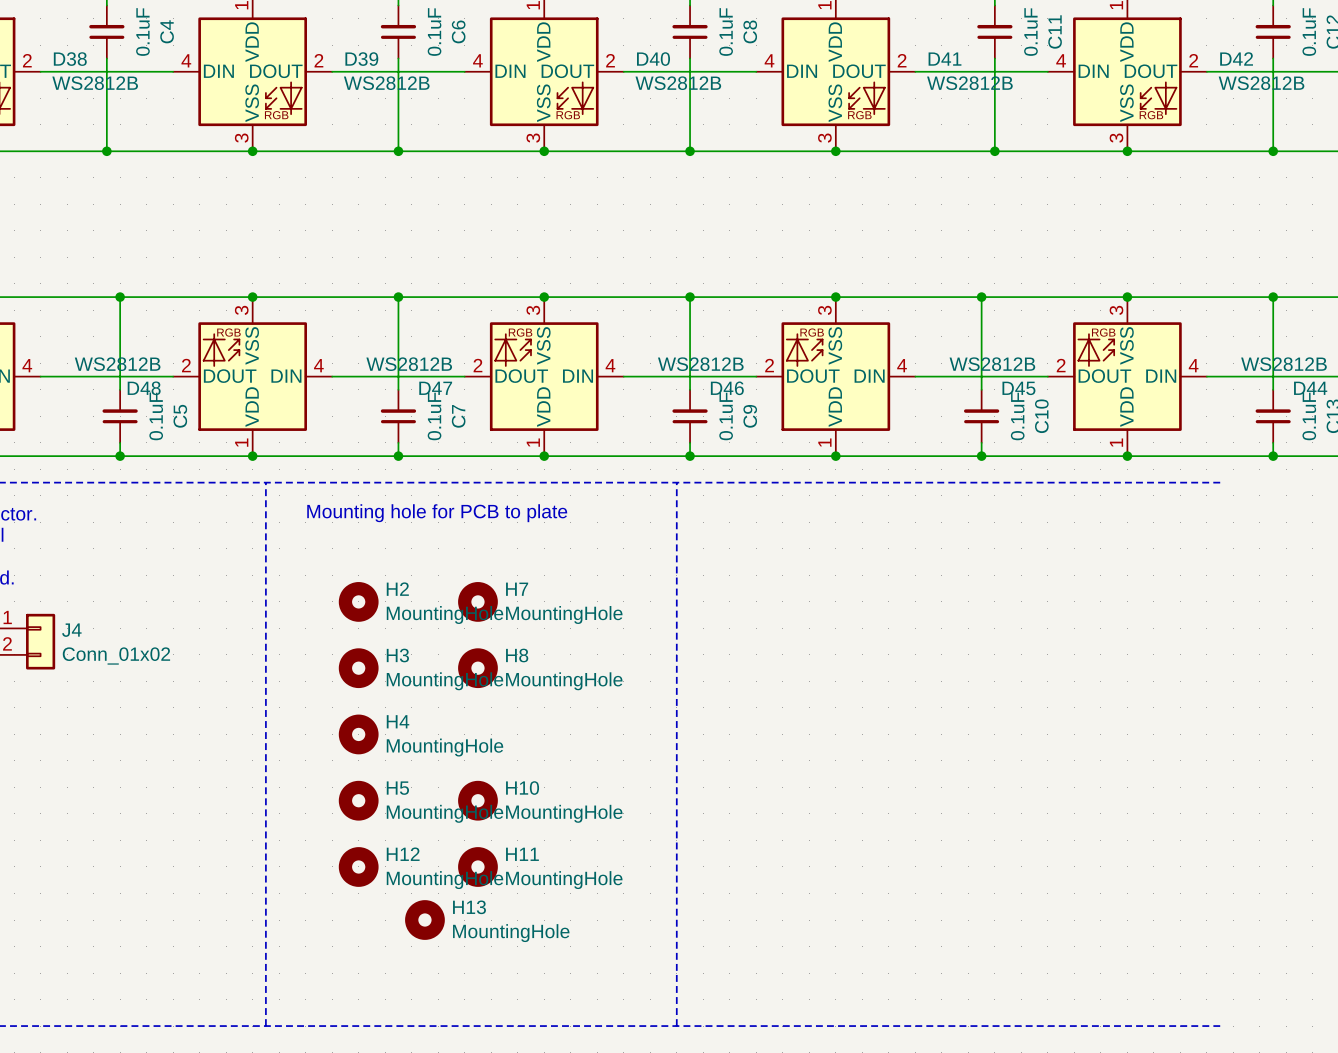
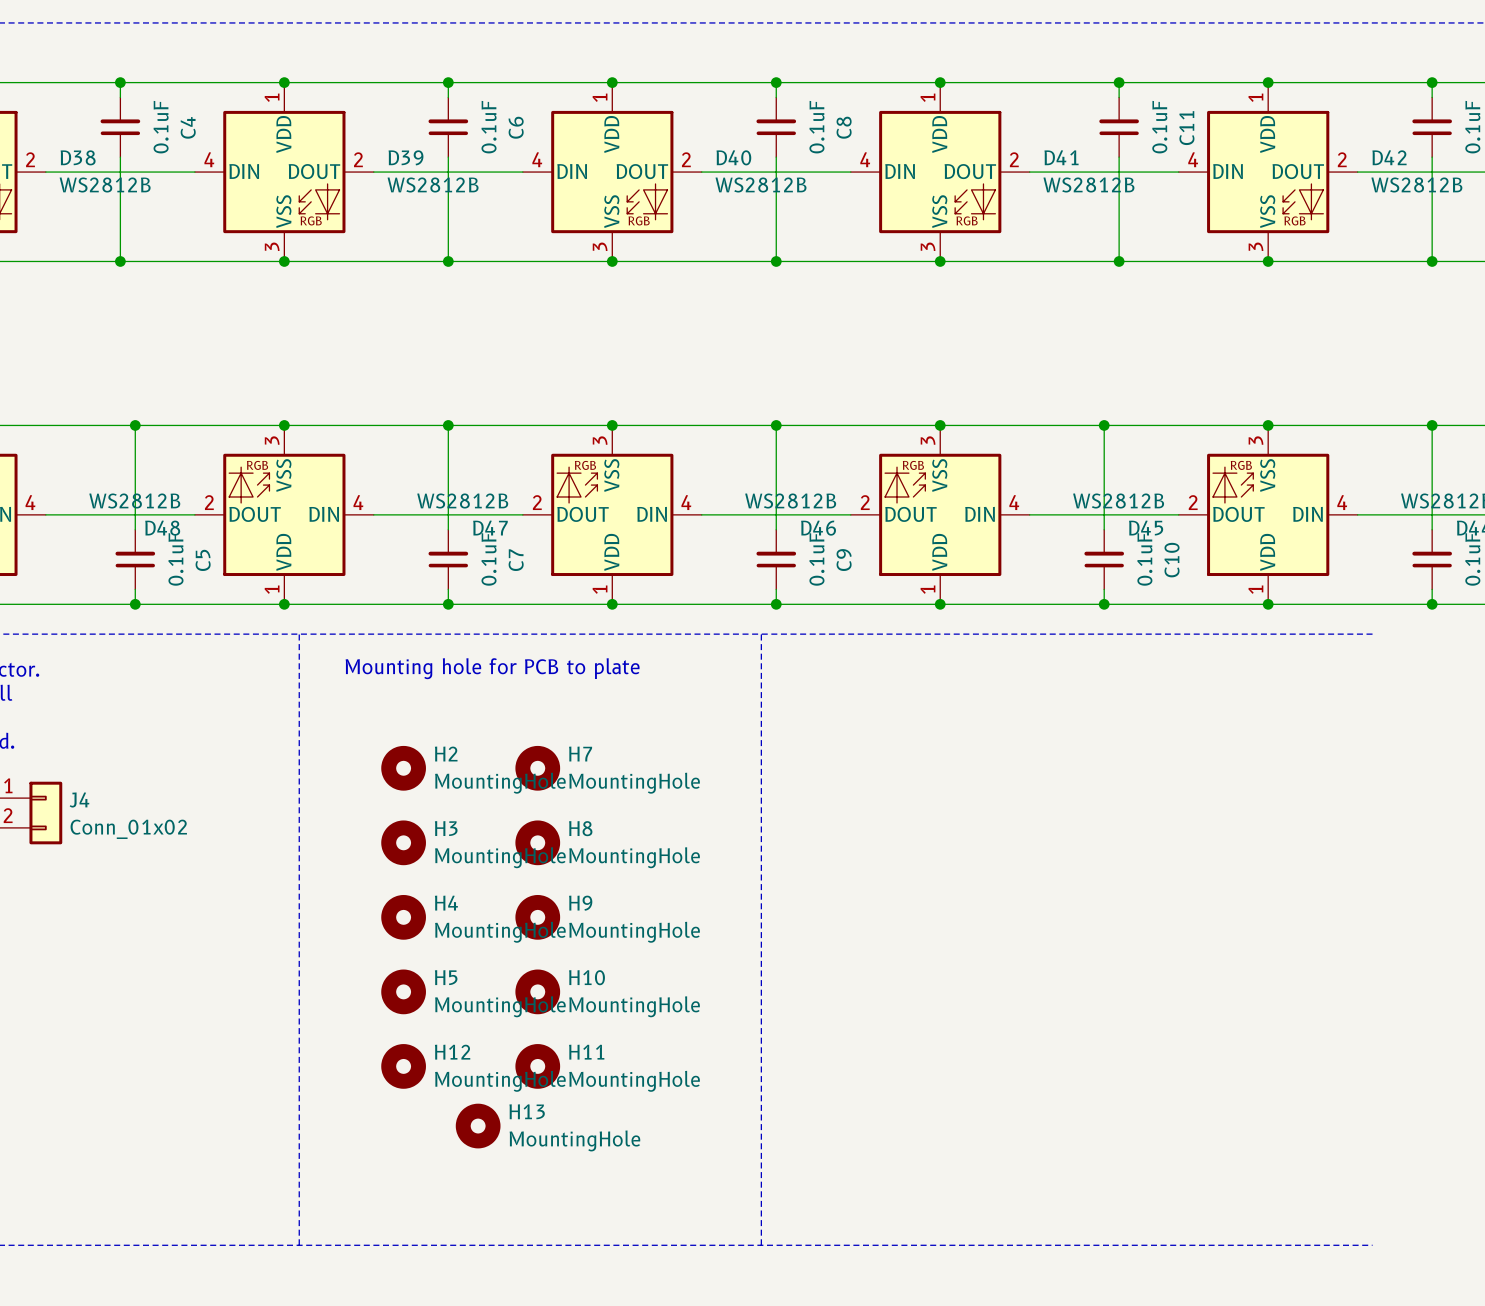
H9: none -> MountingHole (537, 917)

